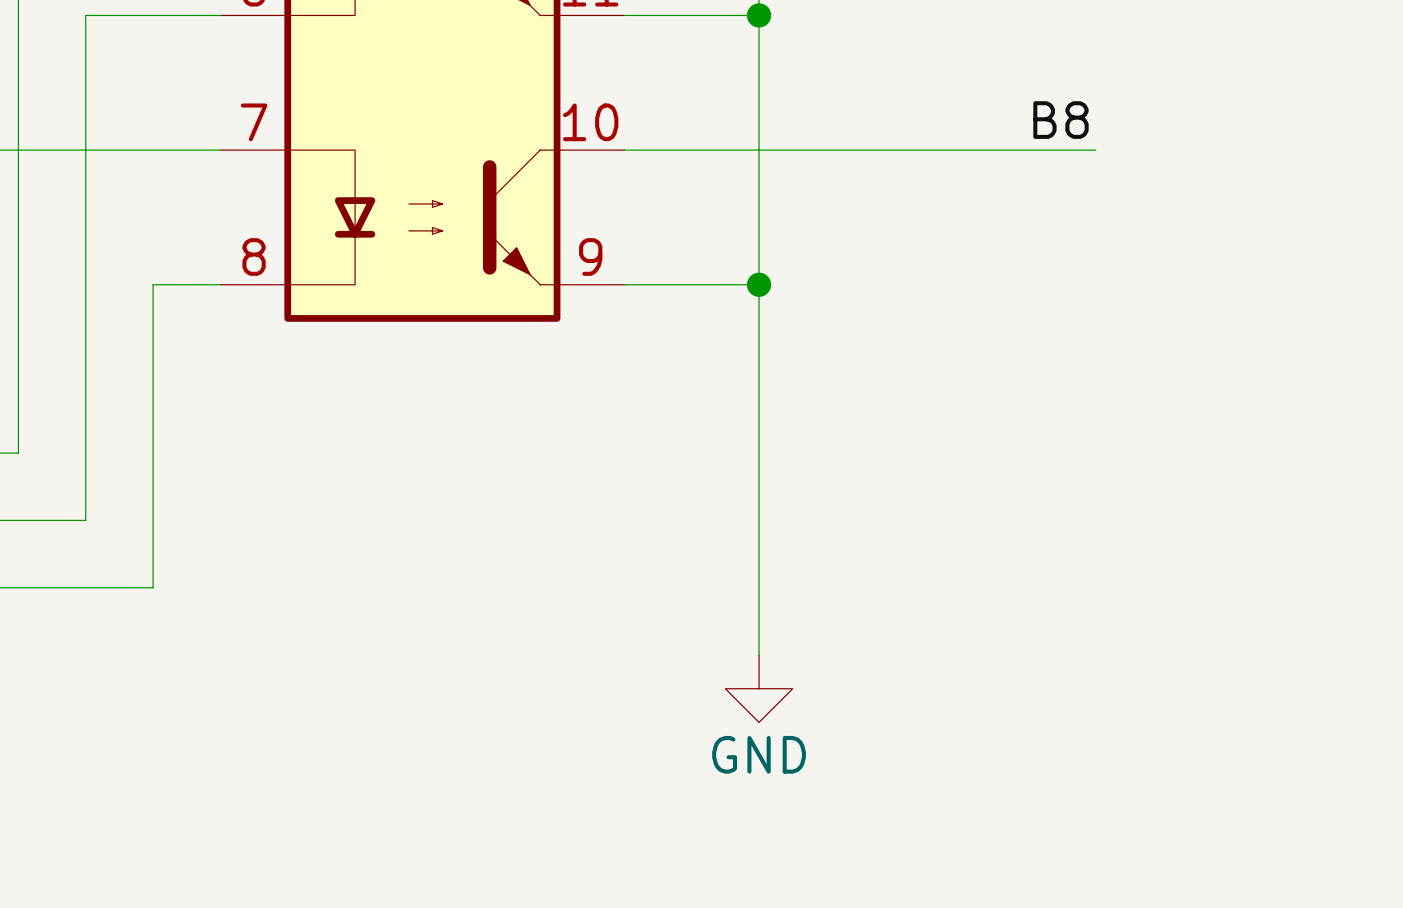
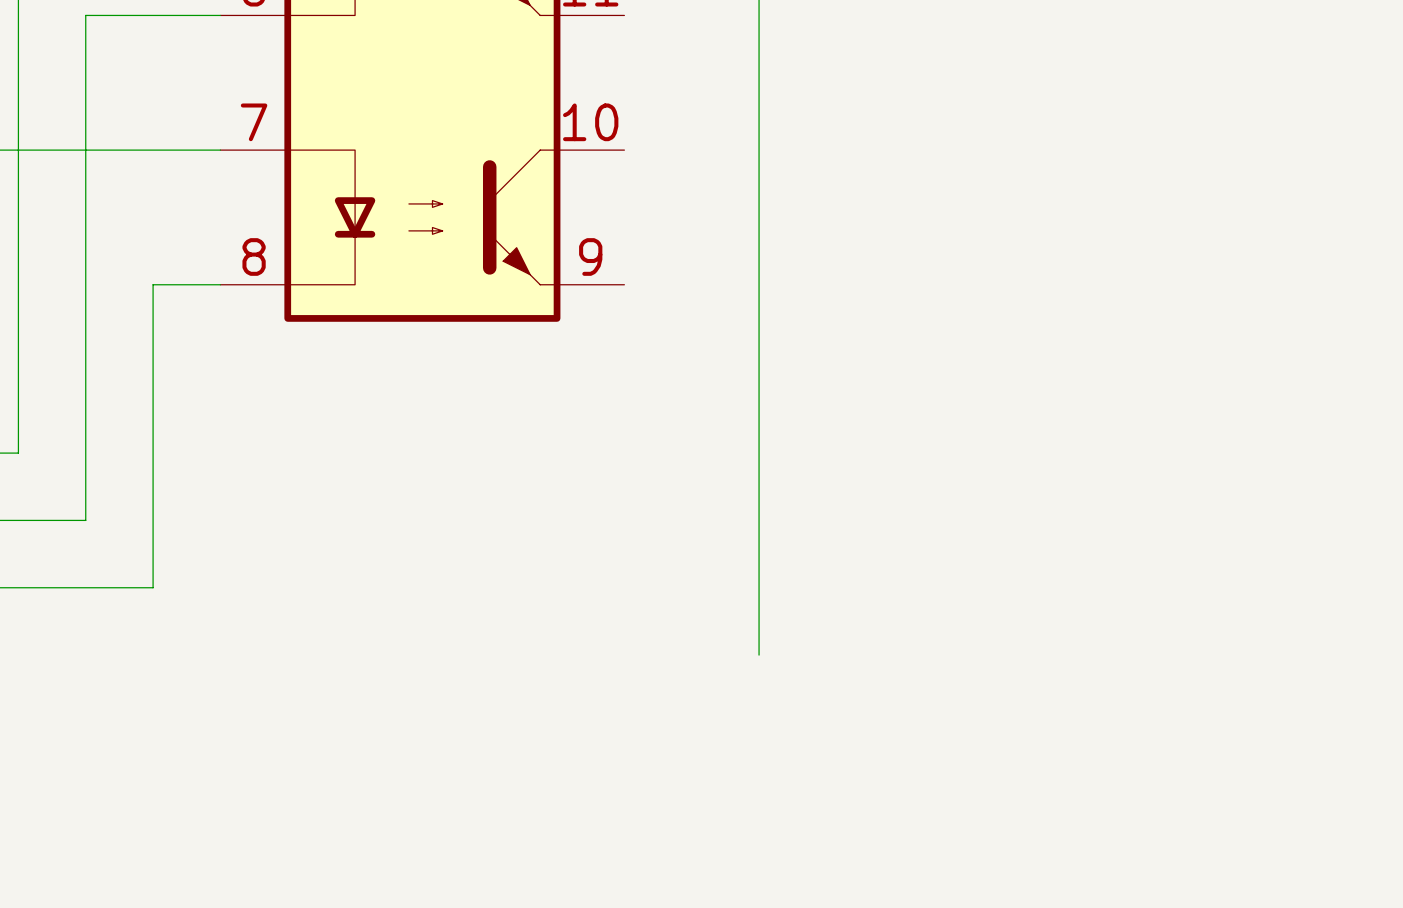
wire: (624, 15) (759, 15) -> none
junction: (759, 15) -> none
label: B8 (1060, 120) -> none
wire: (624, 150) (1095, 150) -> none
wire: (624, 284) (759, 284) -> none
junction: (759, 284) -> none
power symbol: GND (759, 688) -> none

